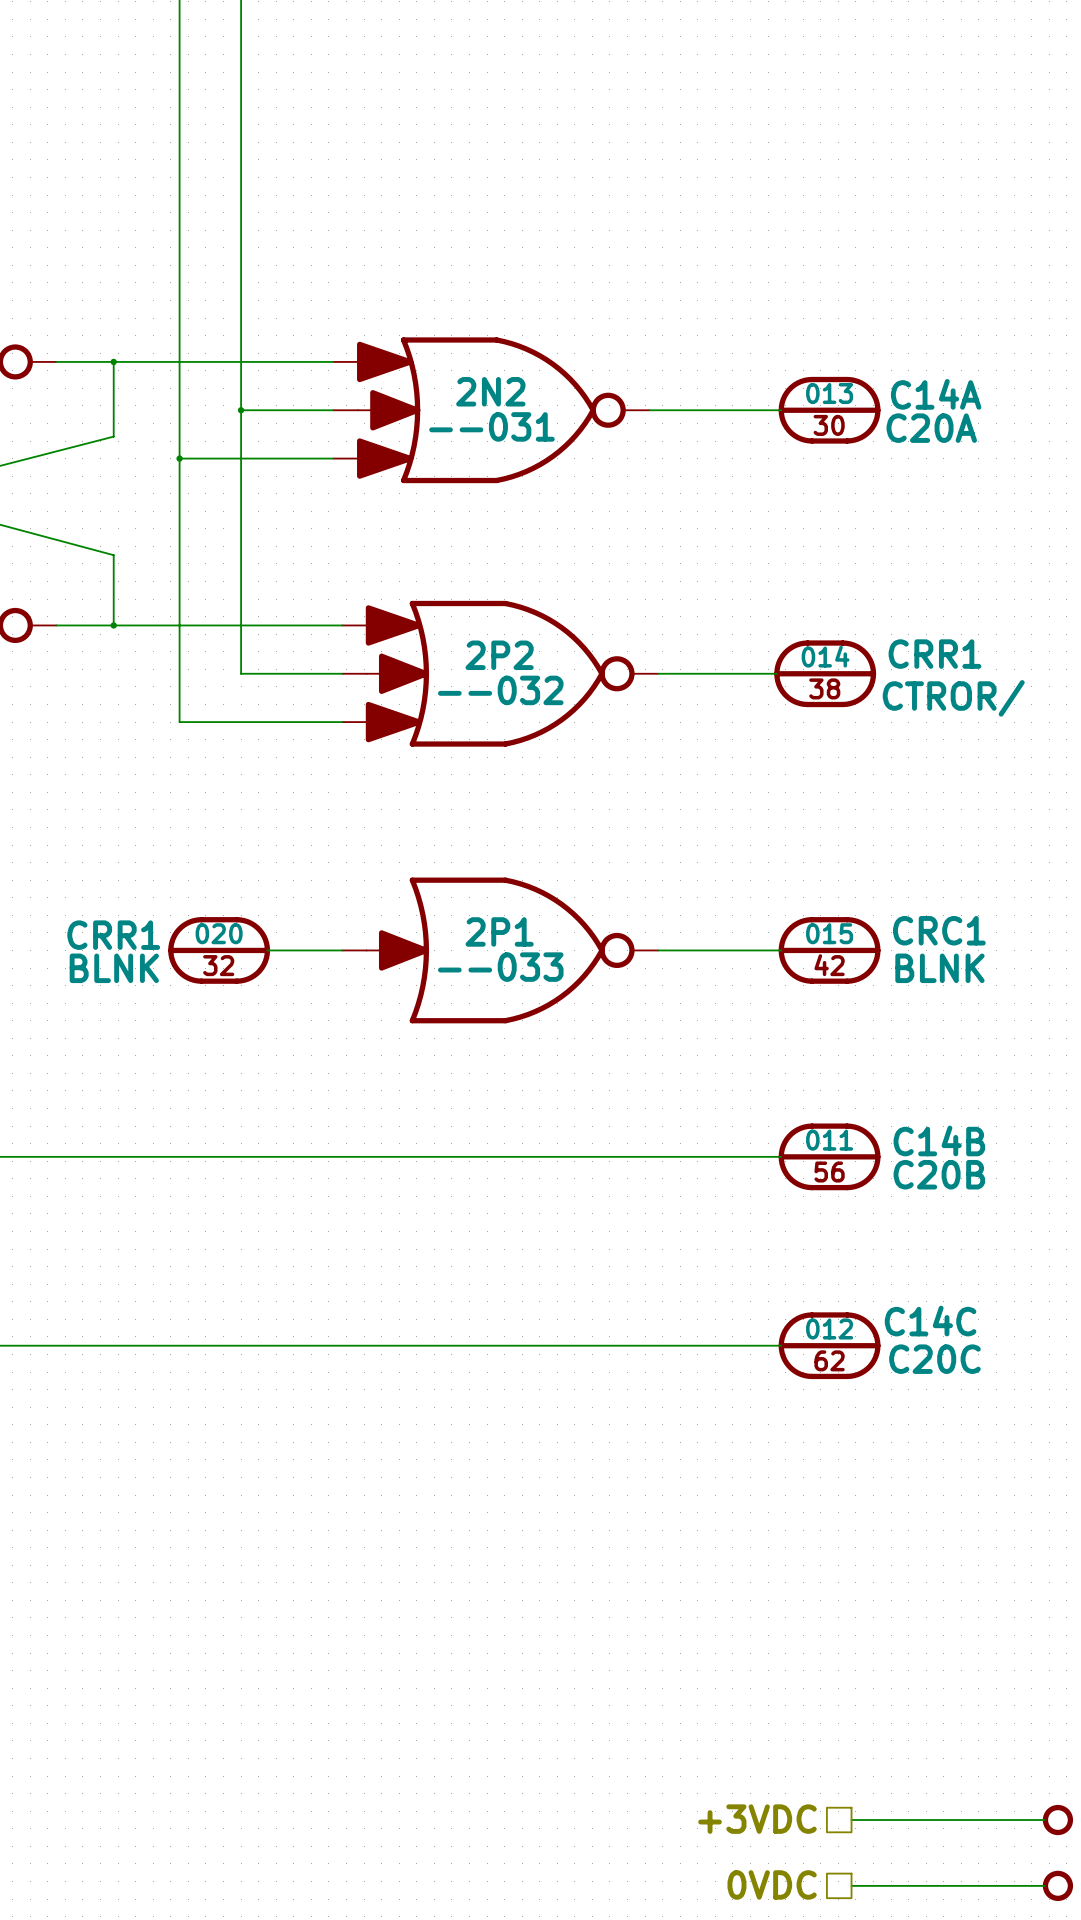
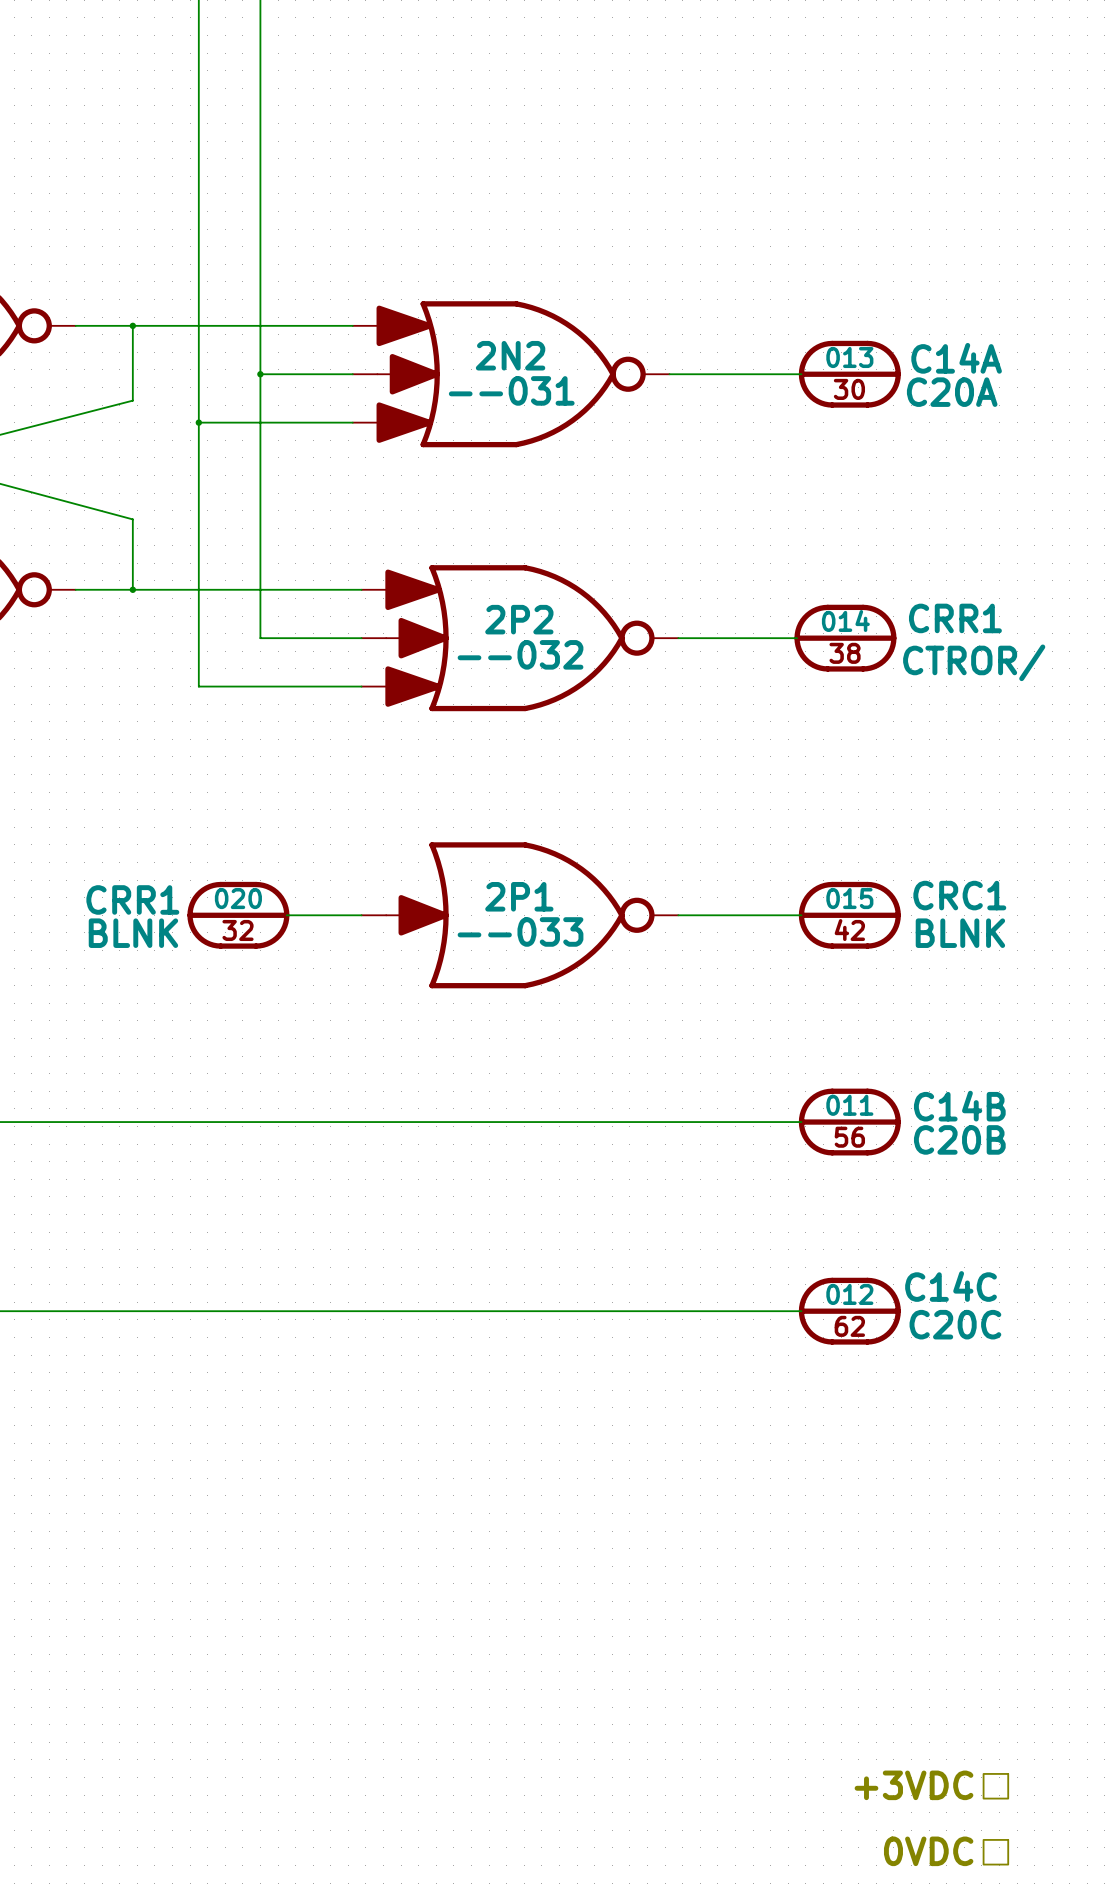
hierarchical label position: +3VDC (757, 1819) -> +3VDC (914, 1785)
wire: (851, 1820) (1044, 1820) -> none
part: (1057, 1820) -> none
hierarchical label position: 0VDC (772, 1884) -> 0VDC (928, 1851)
wire: (851, 1885) (1044, 1885) -> none
part: (1057, 1885) -> none

